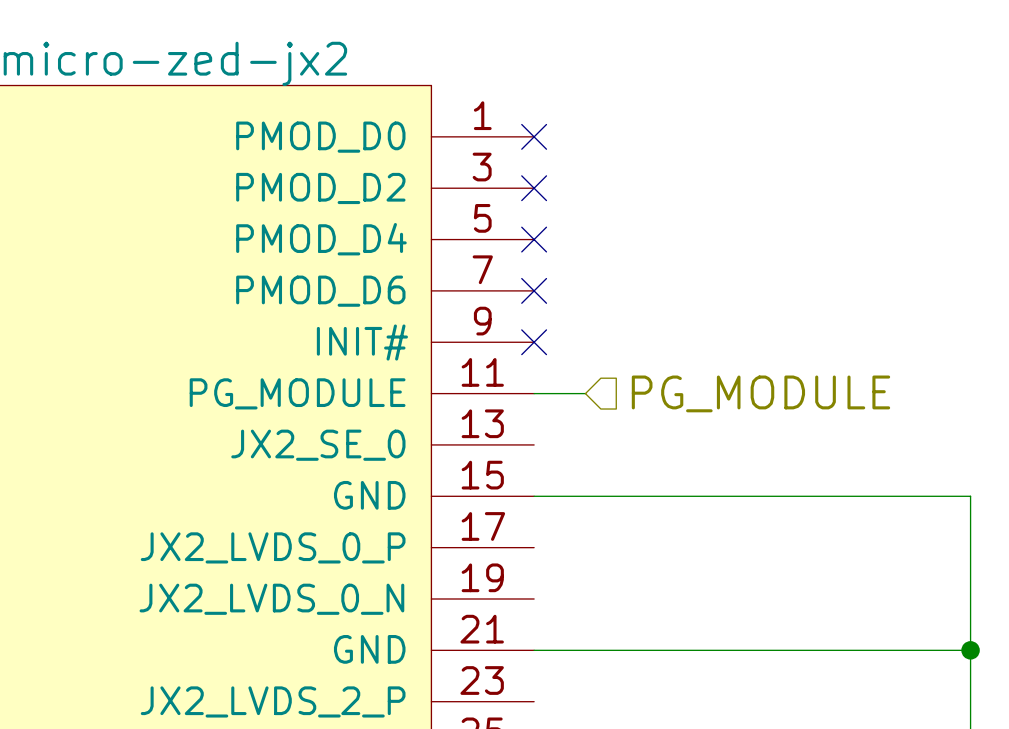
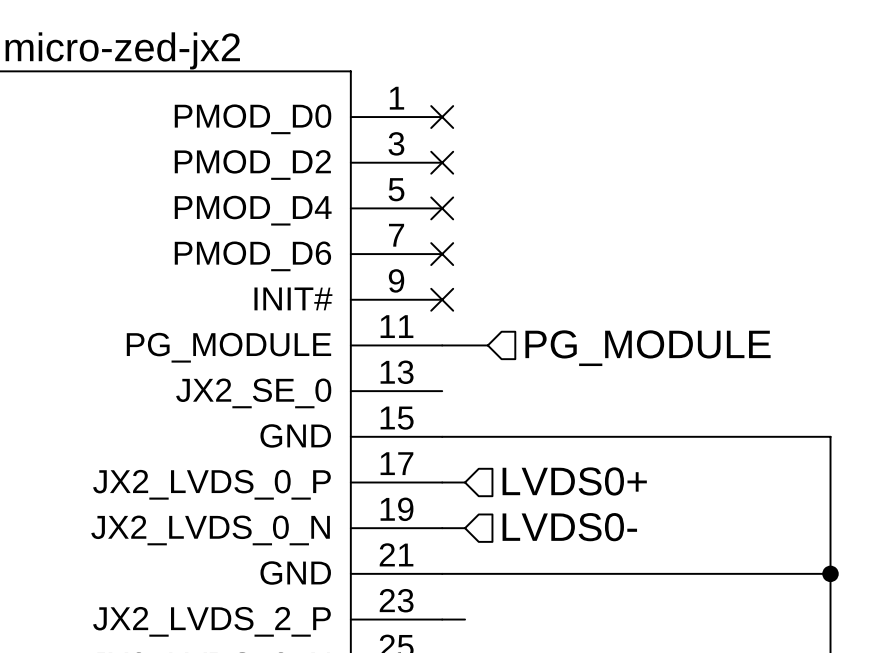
hierarchical label: none -> LVDS0+ (574, 481)
wire: none -> (442, 482) (465, 482)
hierarchical label: none -> LVDS0- (569, 527)
wire: none -> (442, 528) (465, 528)
wire: none -> (442, 619) (465, 619)

